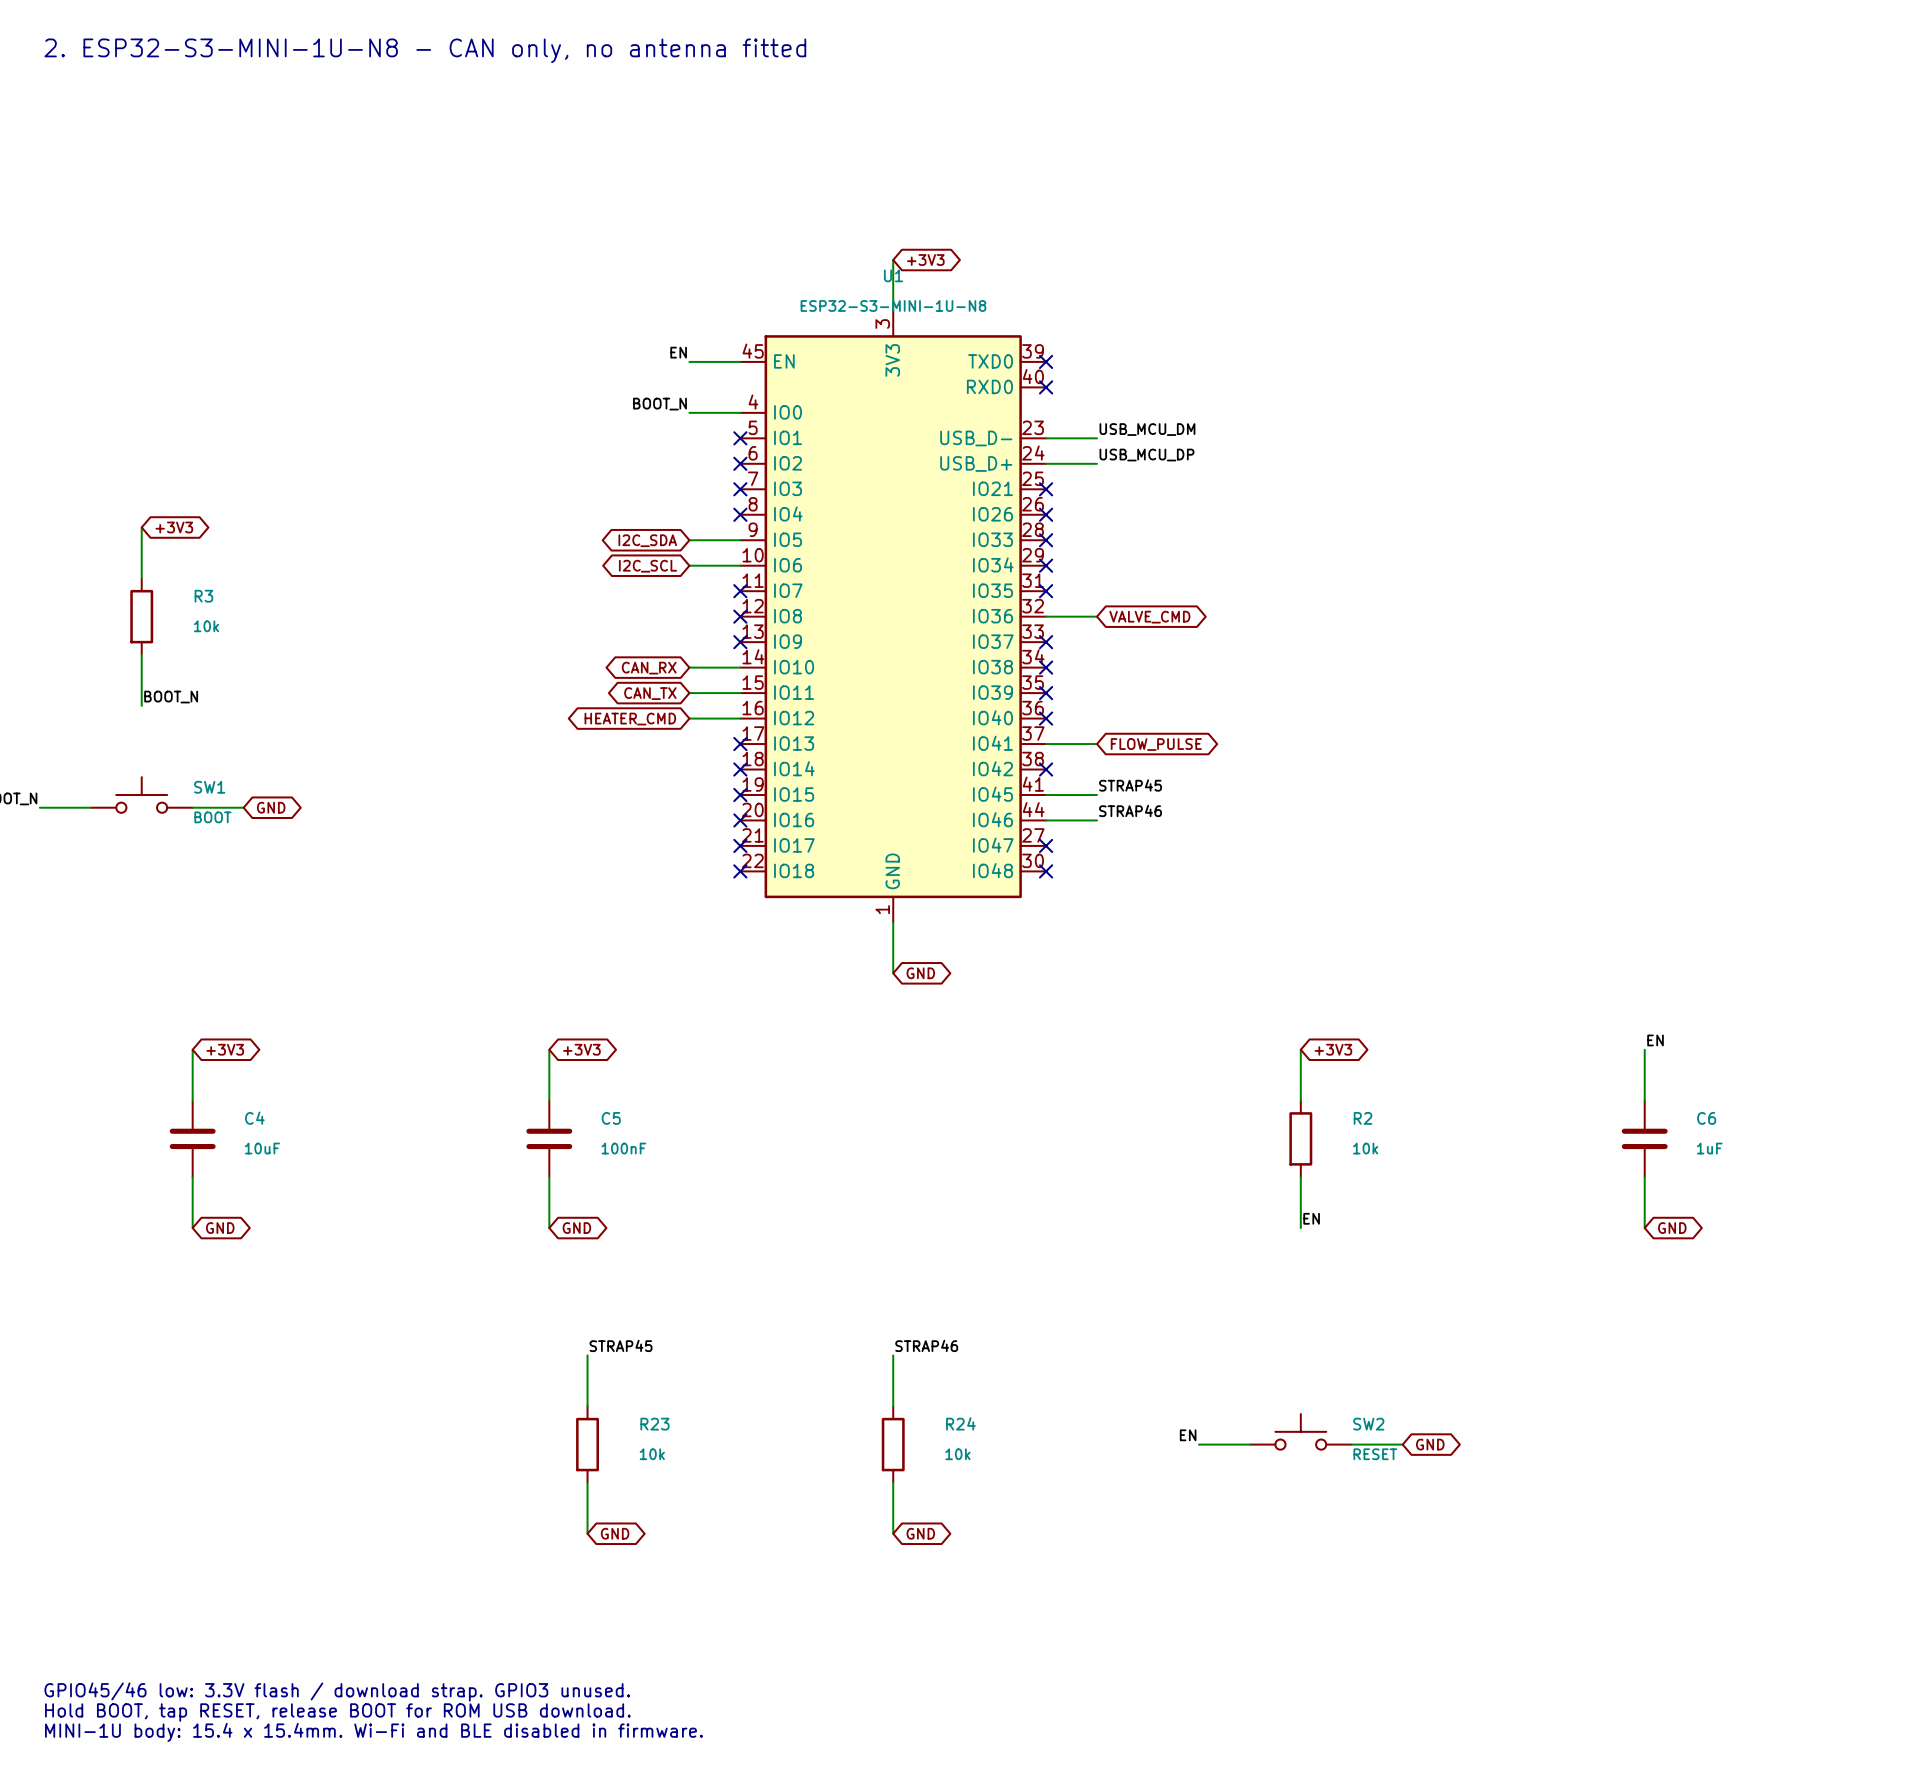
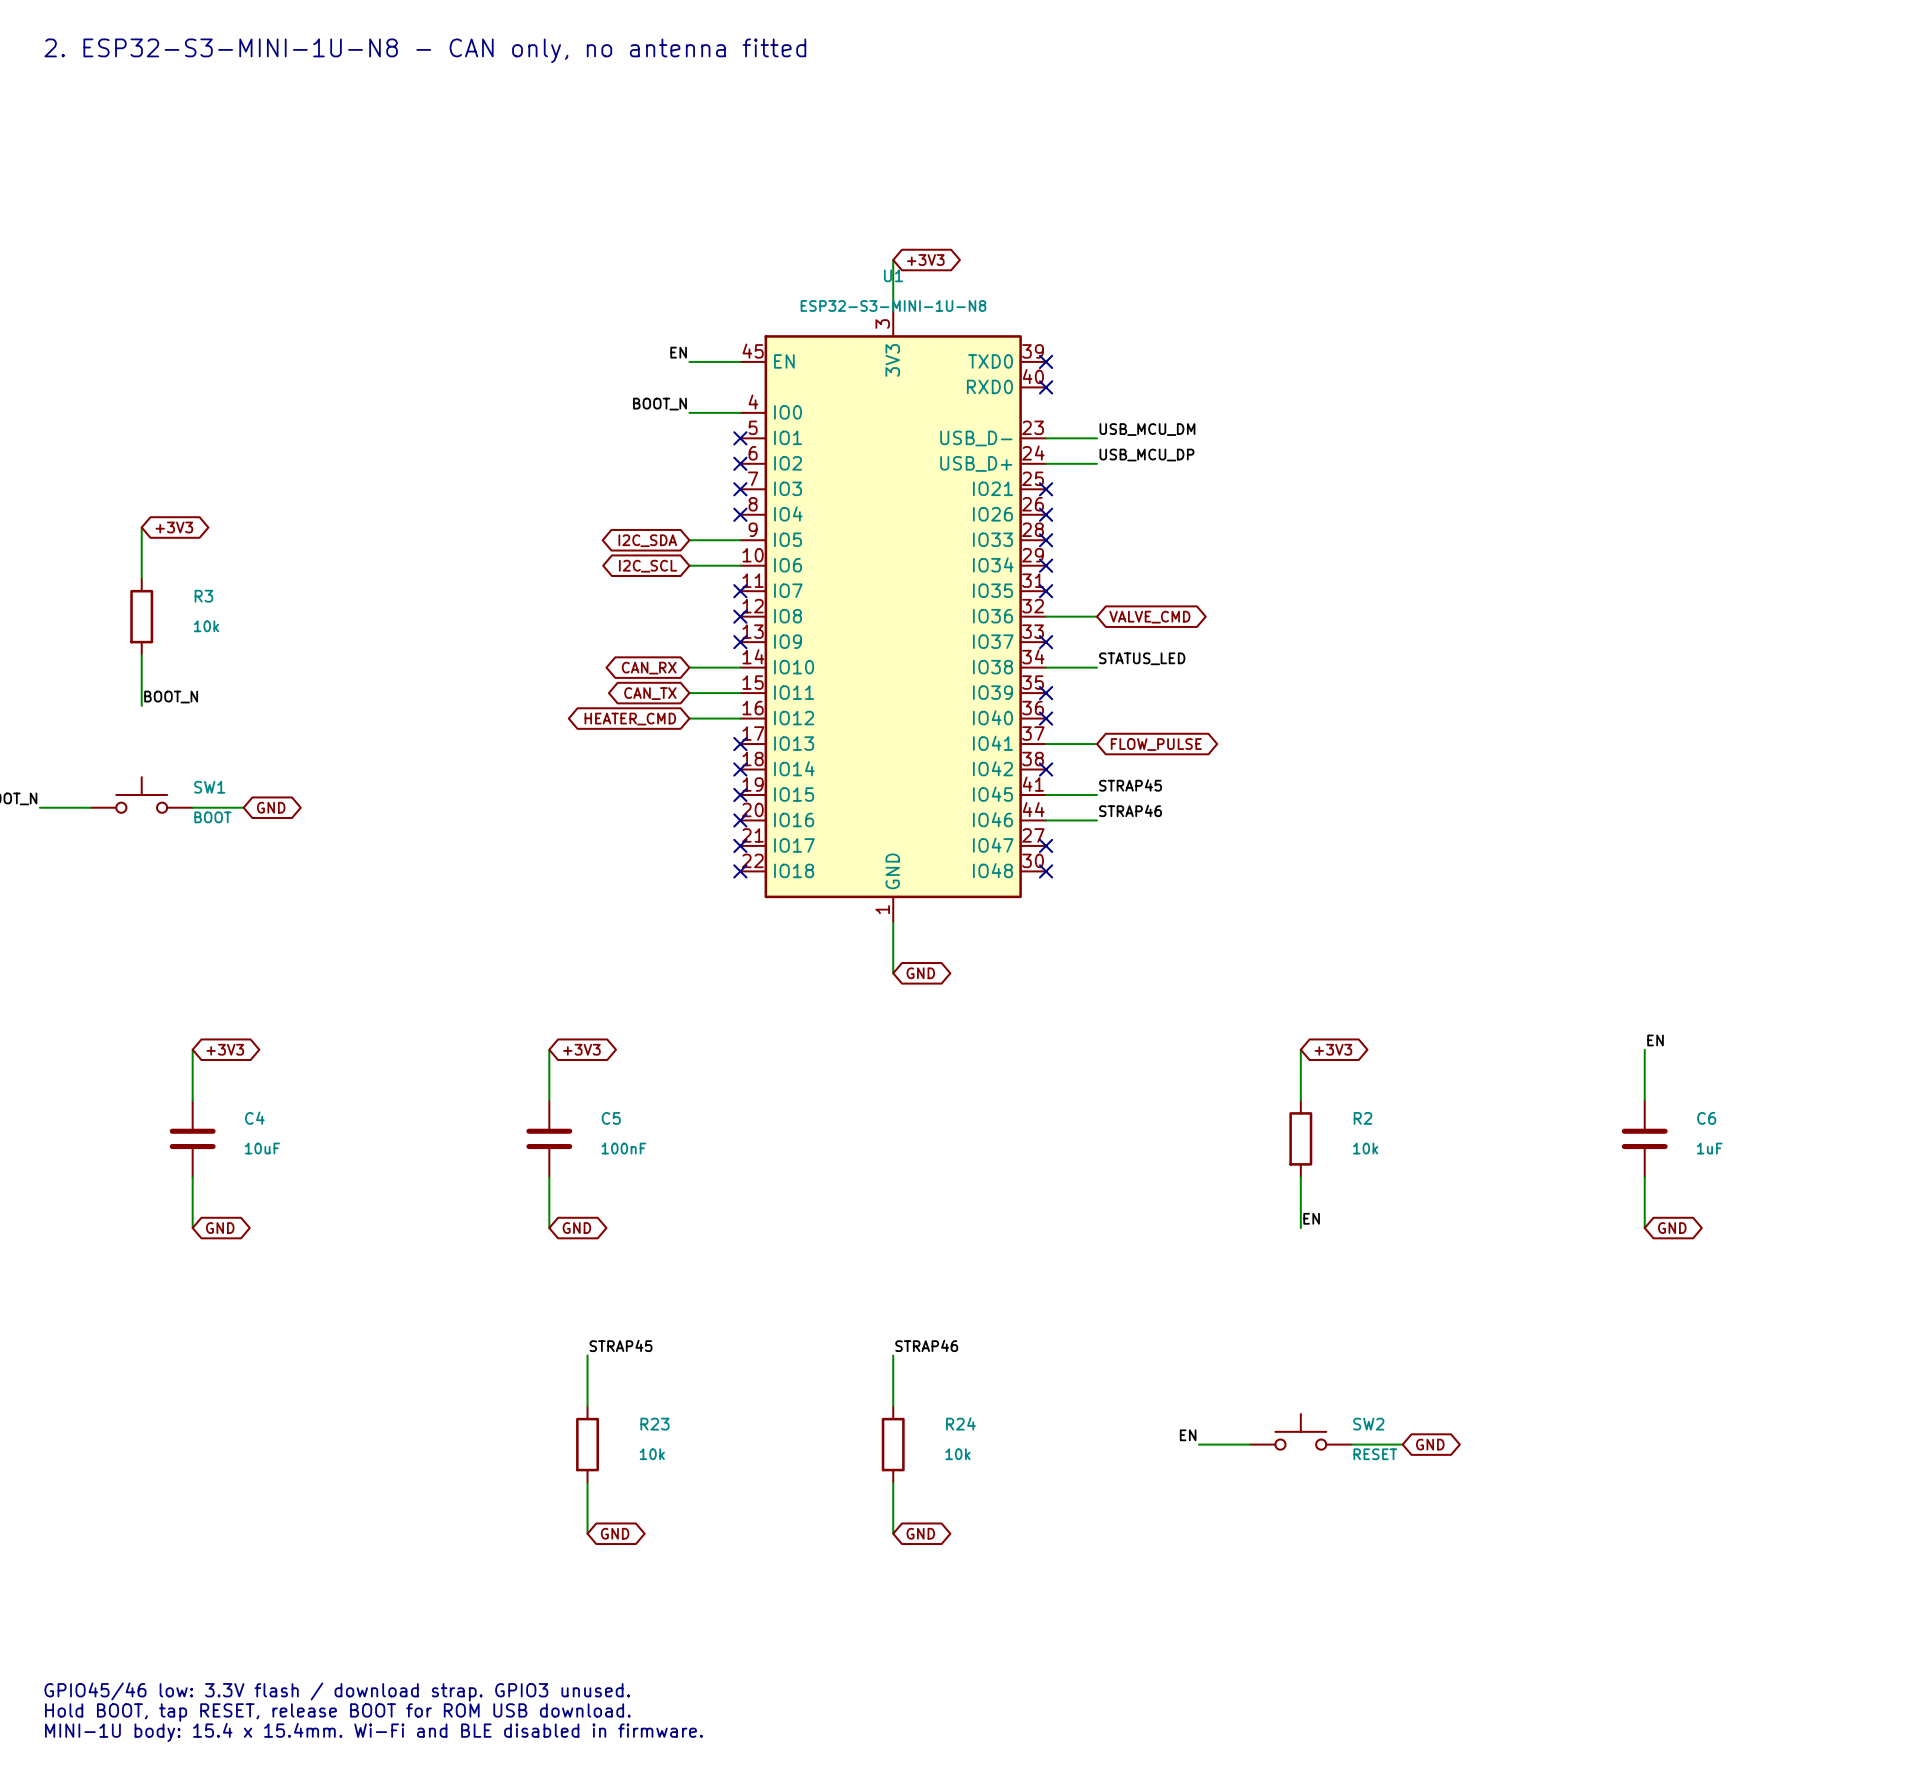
label: none -> STATUS_LED (1142, 658)
wire: none -> (1046, 667) (1097, 667)
no-connect mark: (1046, 667) -> none

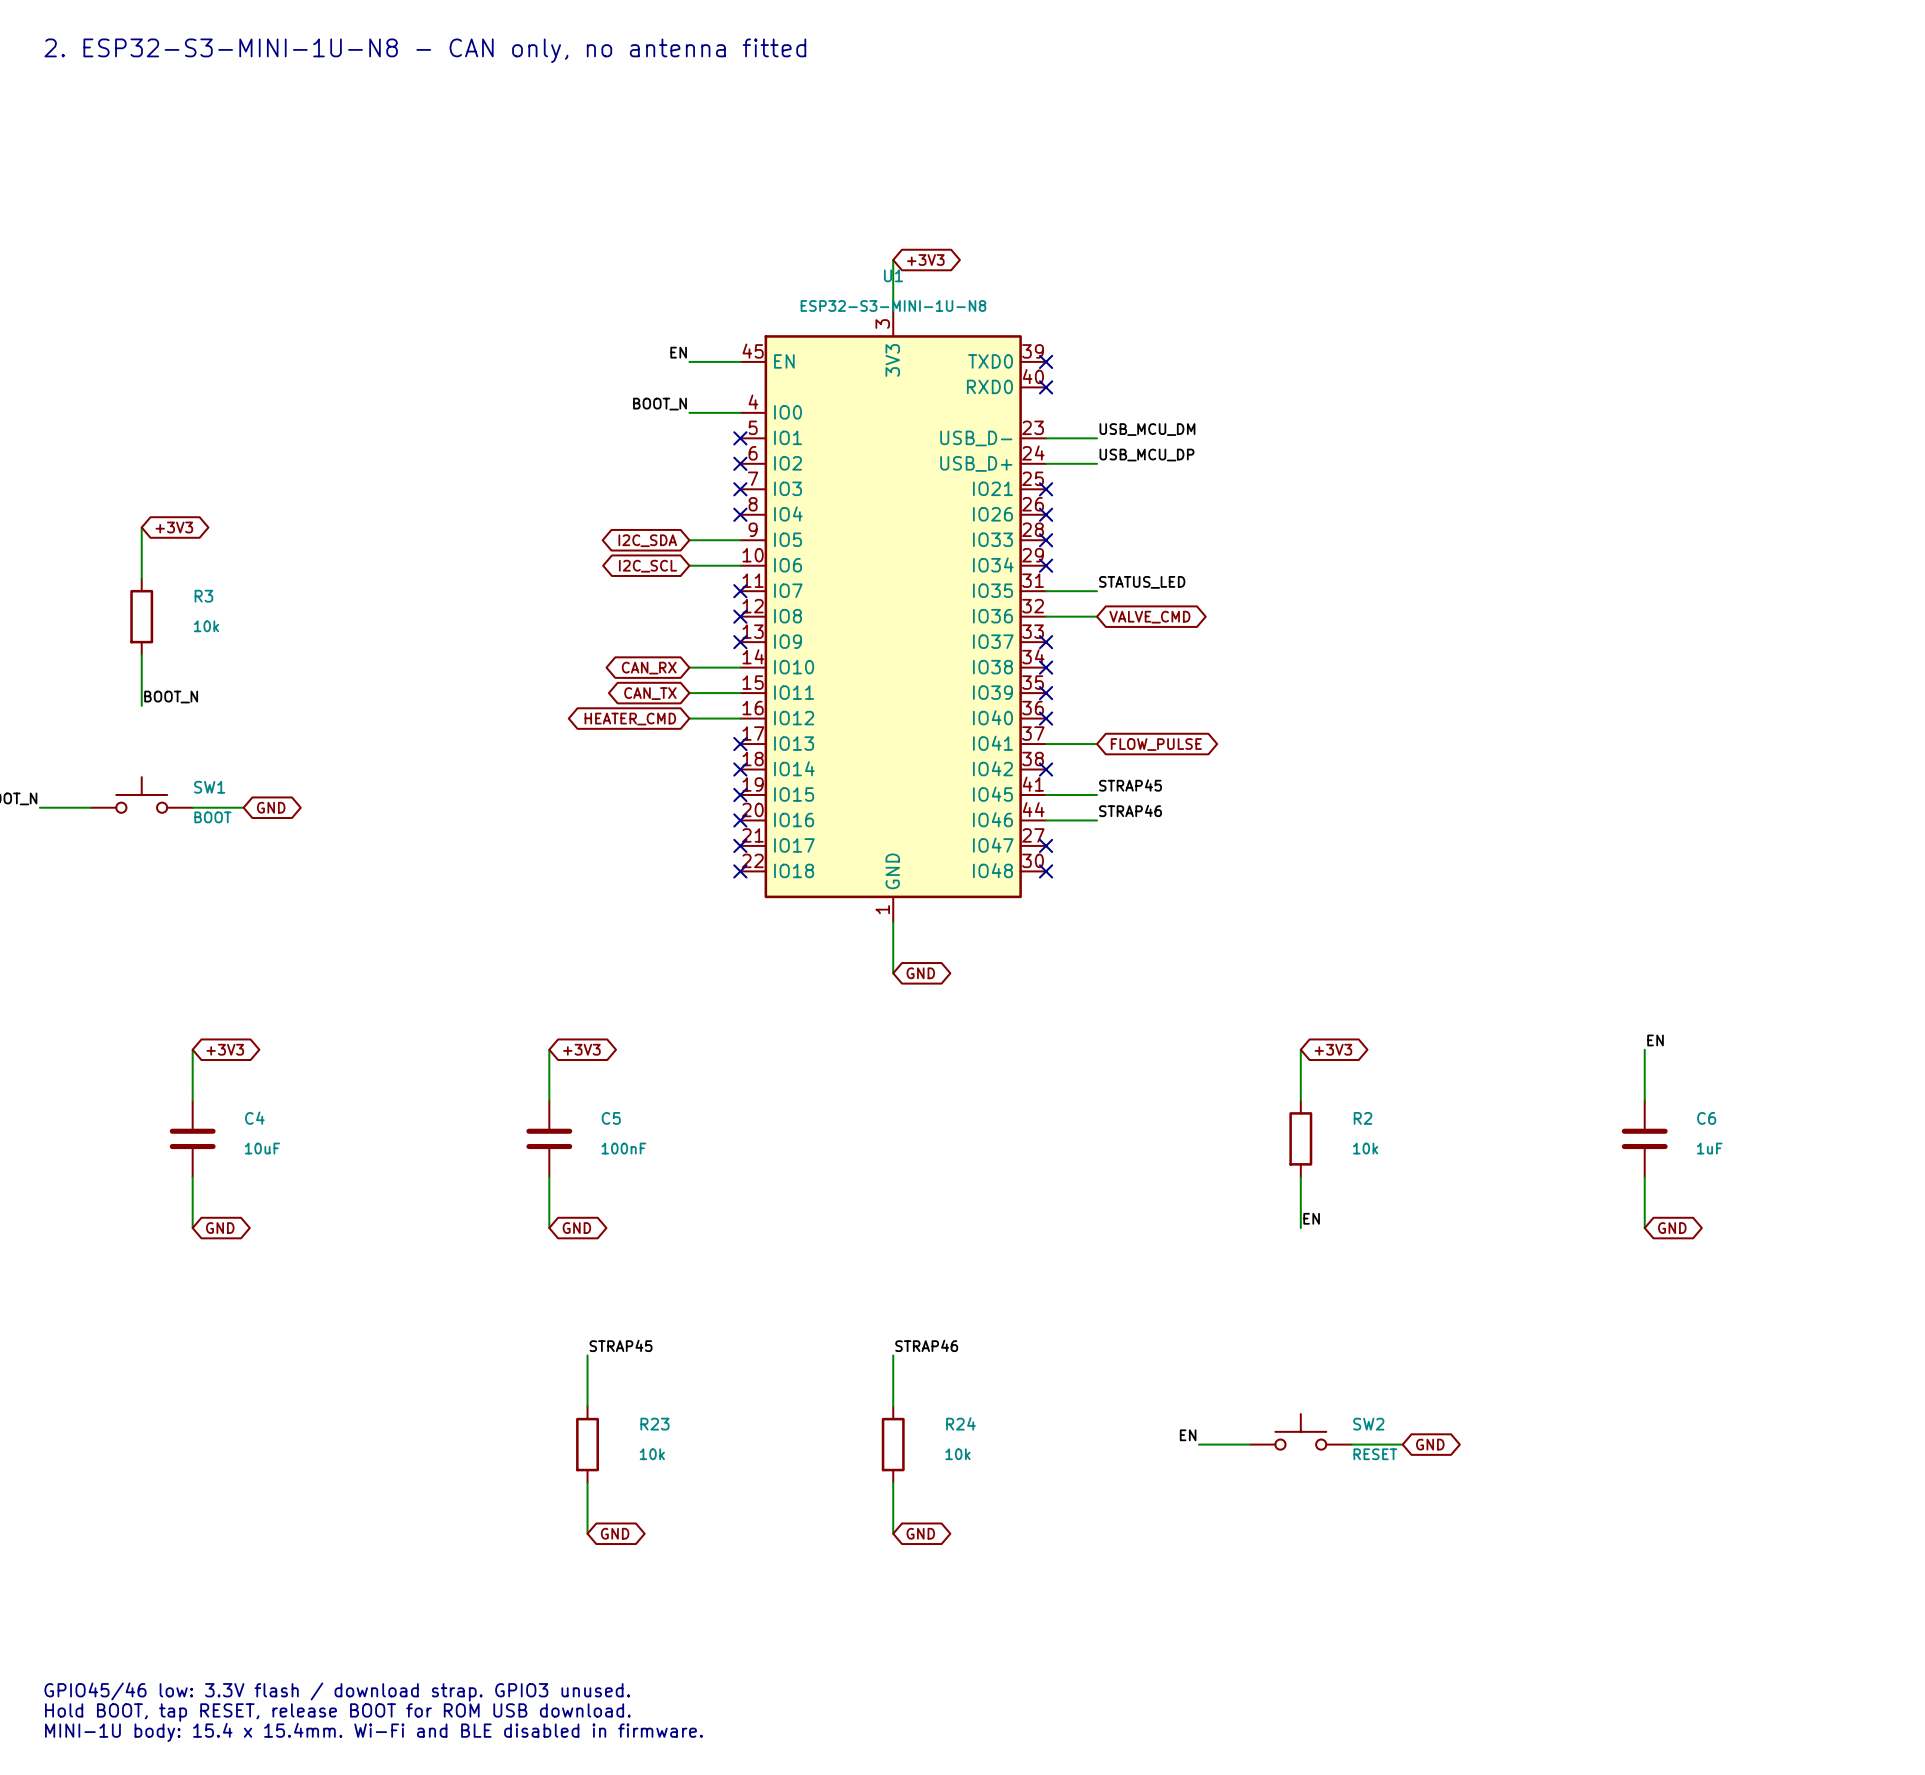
no-connect mark: (1046, 591) -> none
label position: STATUS_LED (1142, 658) -> STATUS_LED (1142, 582)
wire: (1046, 667) (1097, 667) -> (1046, 591) (1097, 591)
no-connect mark: none -> (1046, 667)

